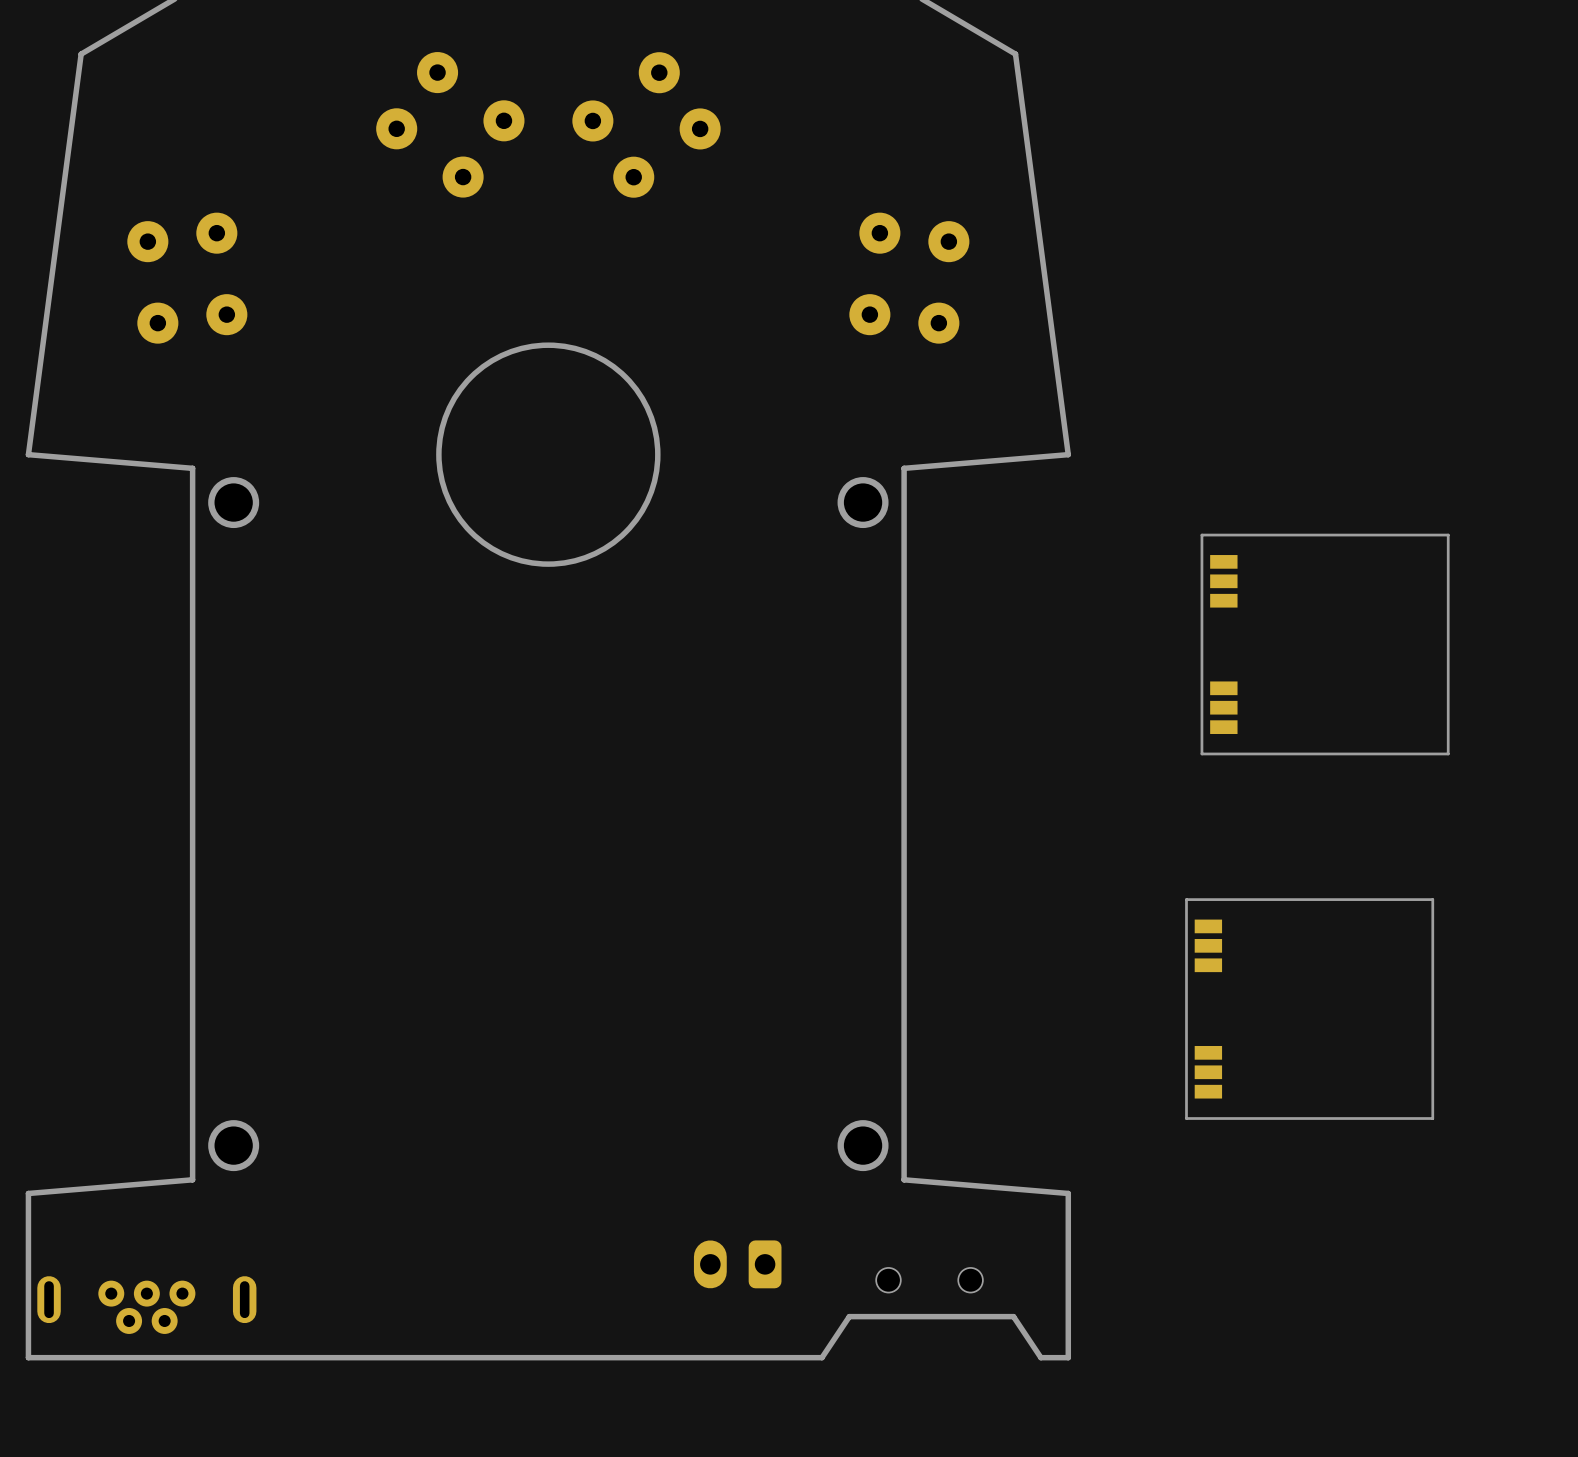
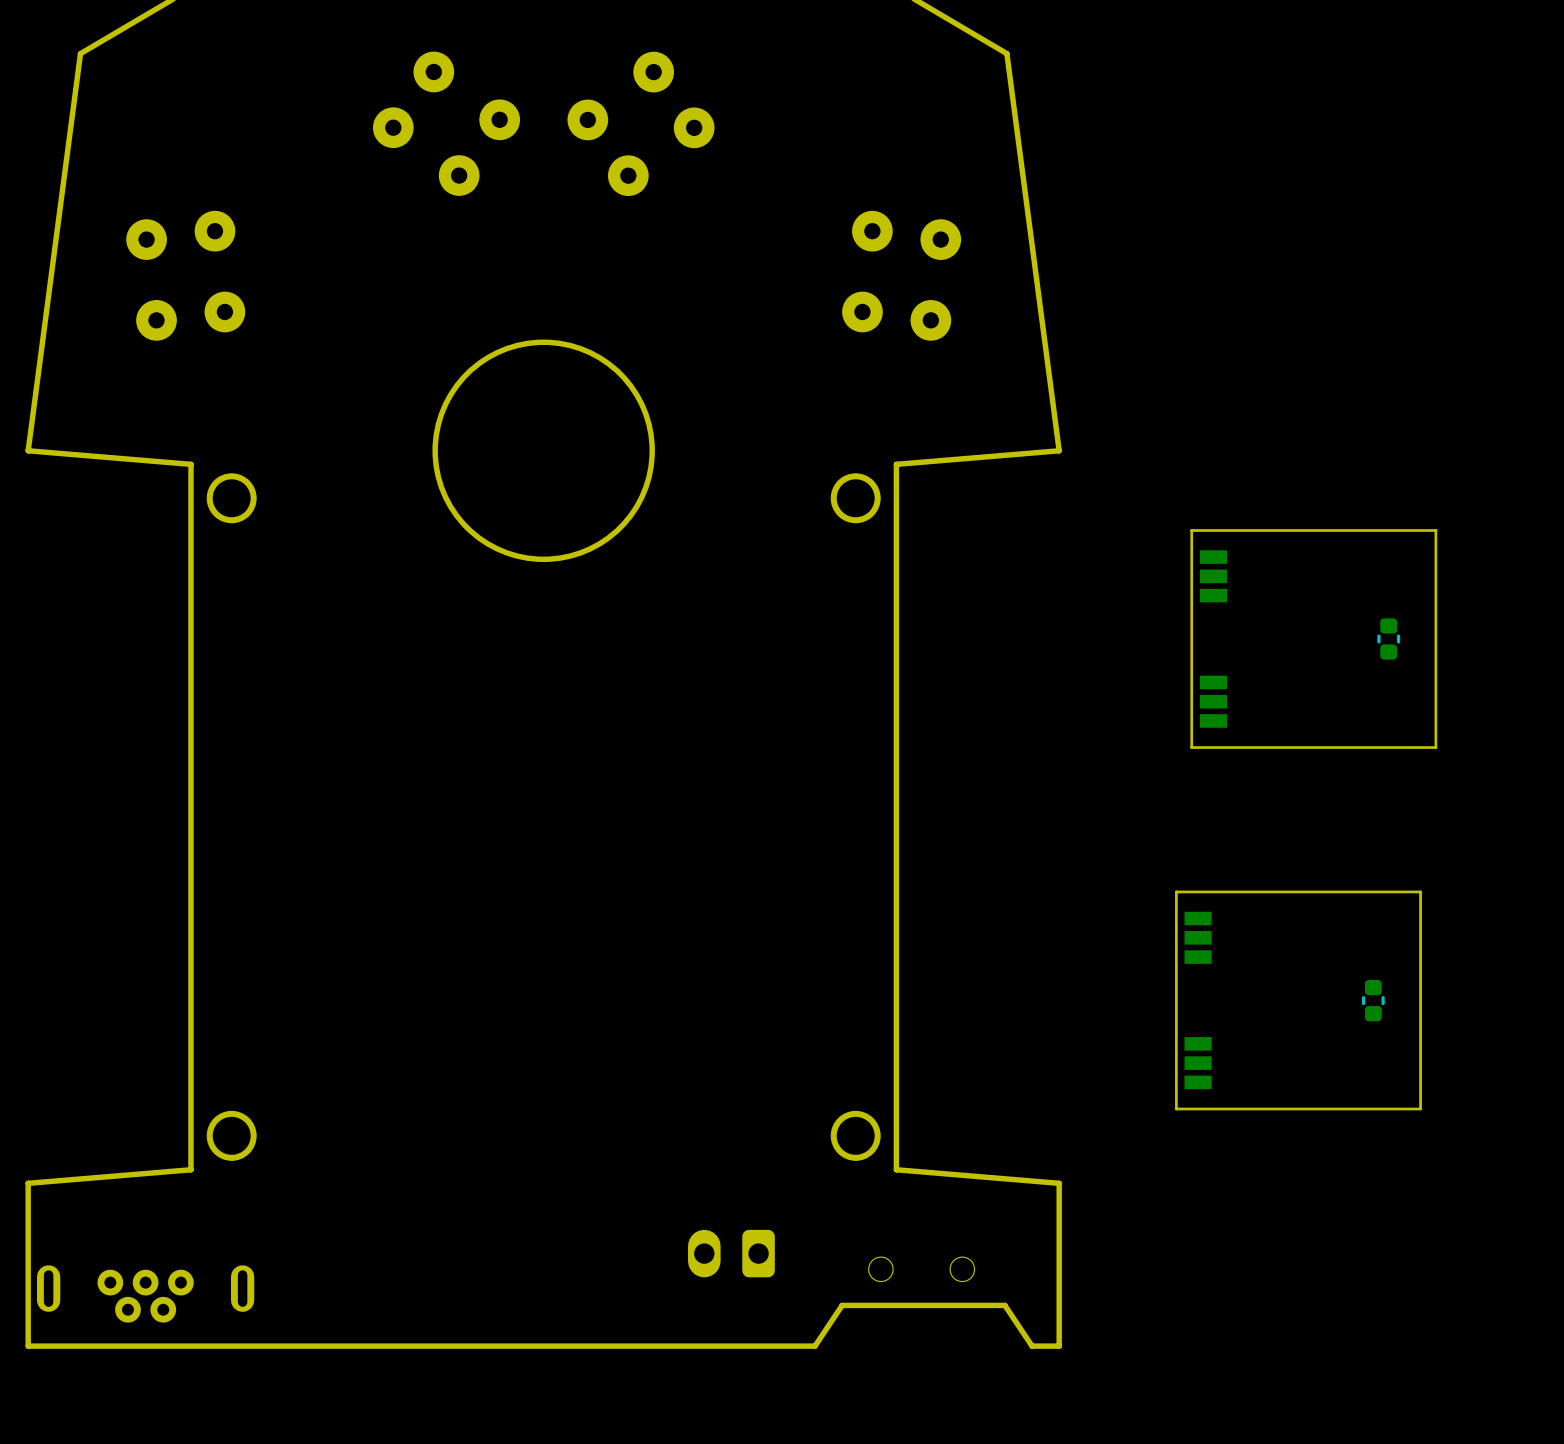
part: none -> (1388, 638)
part: none -> (1373, 1000)

